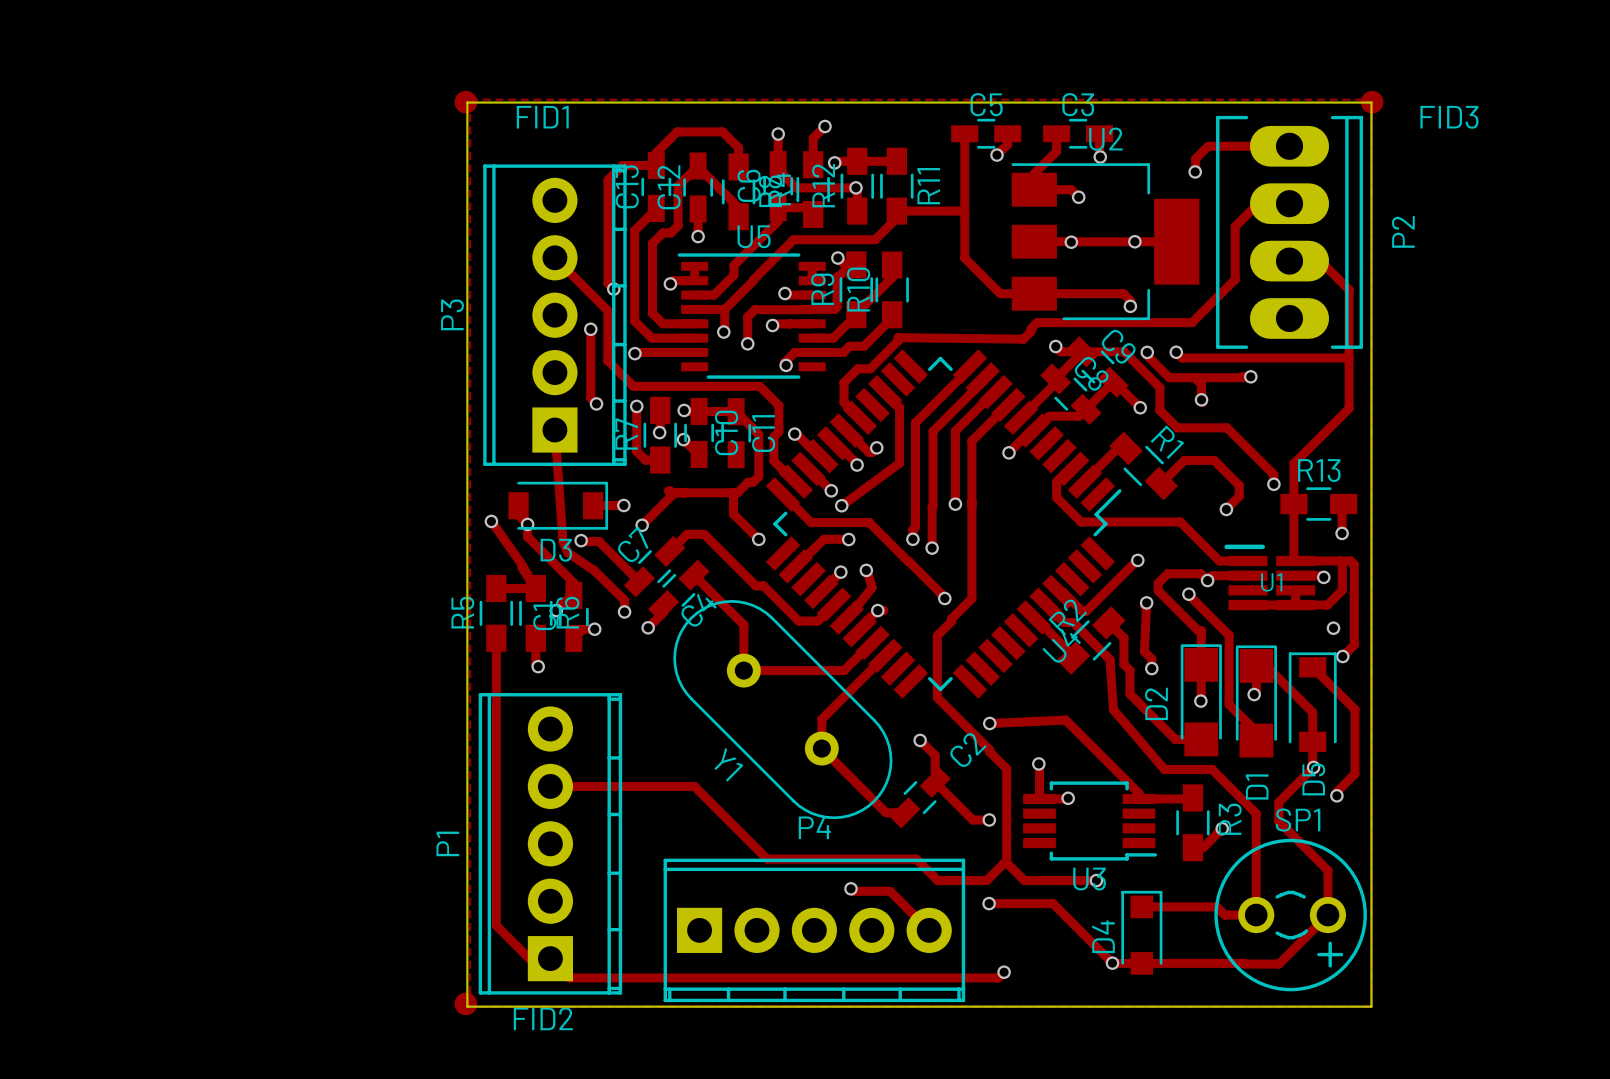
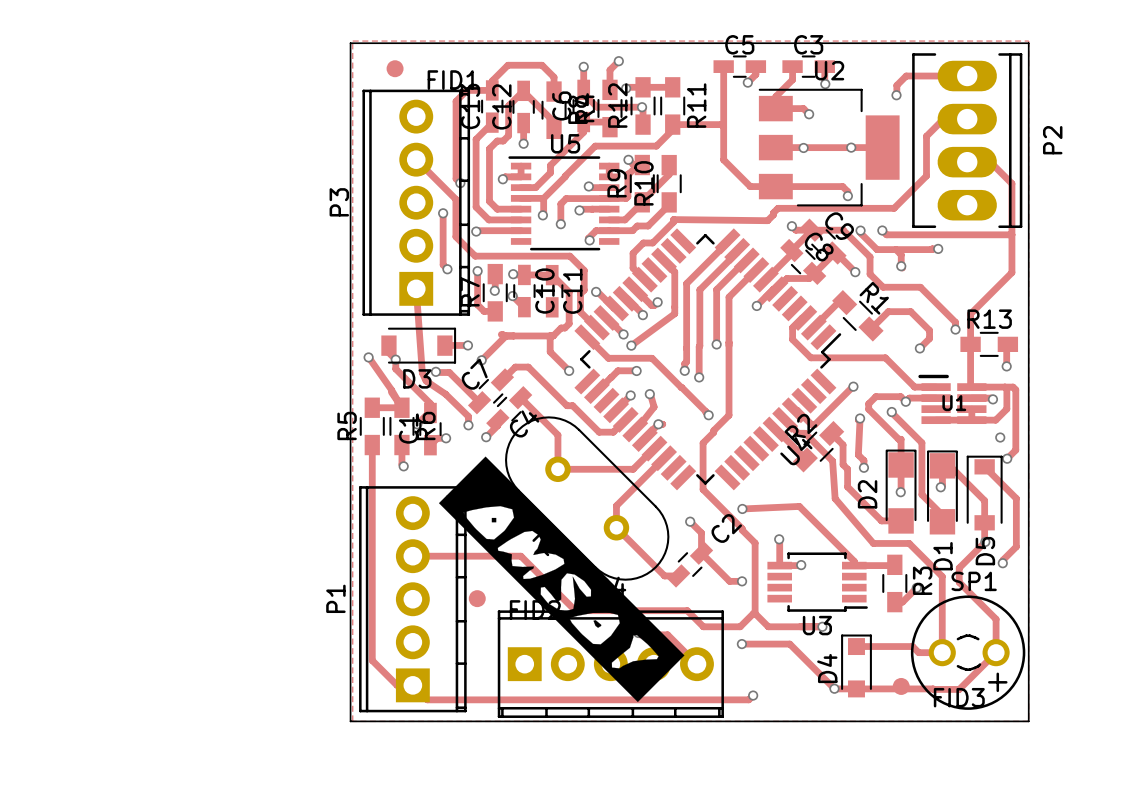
FID1 position: (465, 102) -> (395, 68)
FID3 position: (1372, 102) -> (901, 686)
drawing: none -> [438, 456, 685, 703]
FID2 position: (465, 1003) -> (477, 598)

